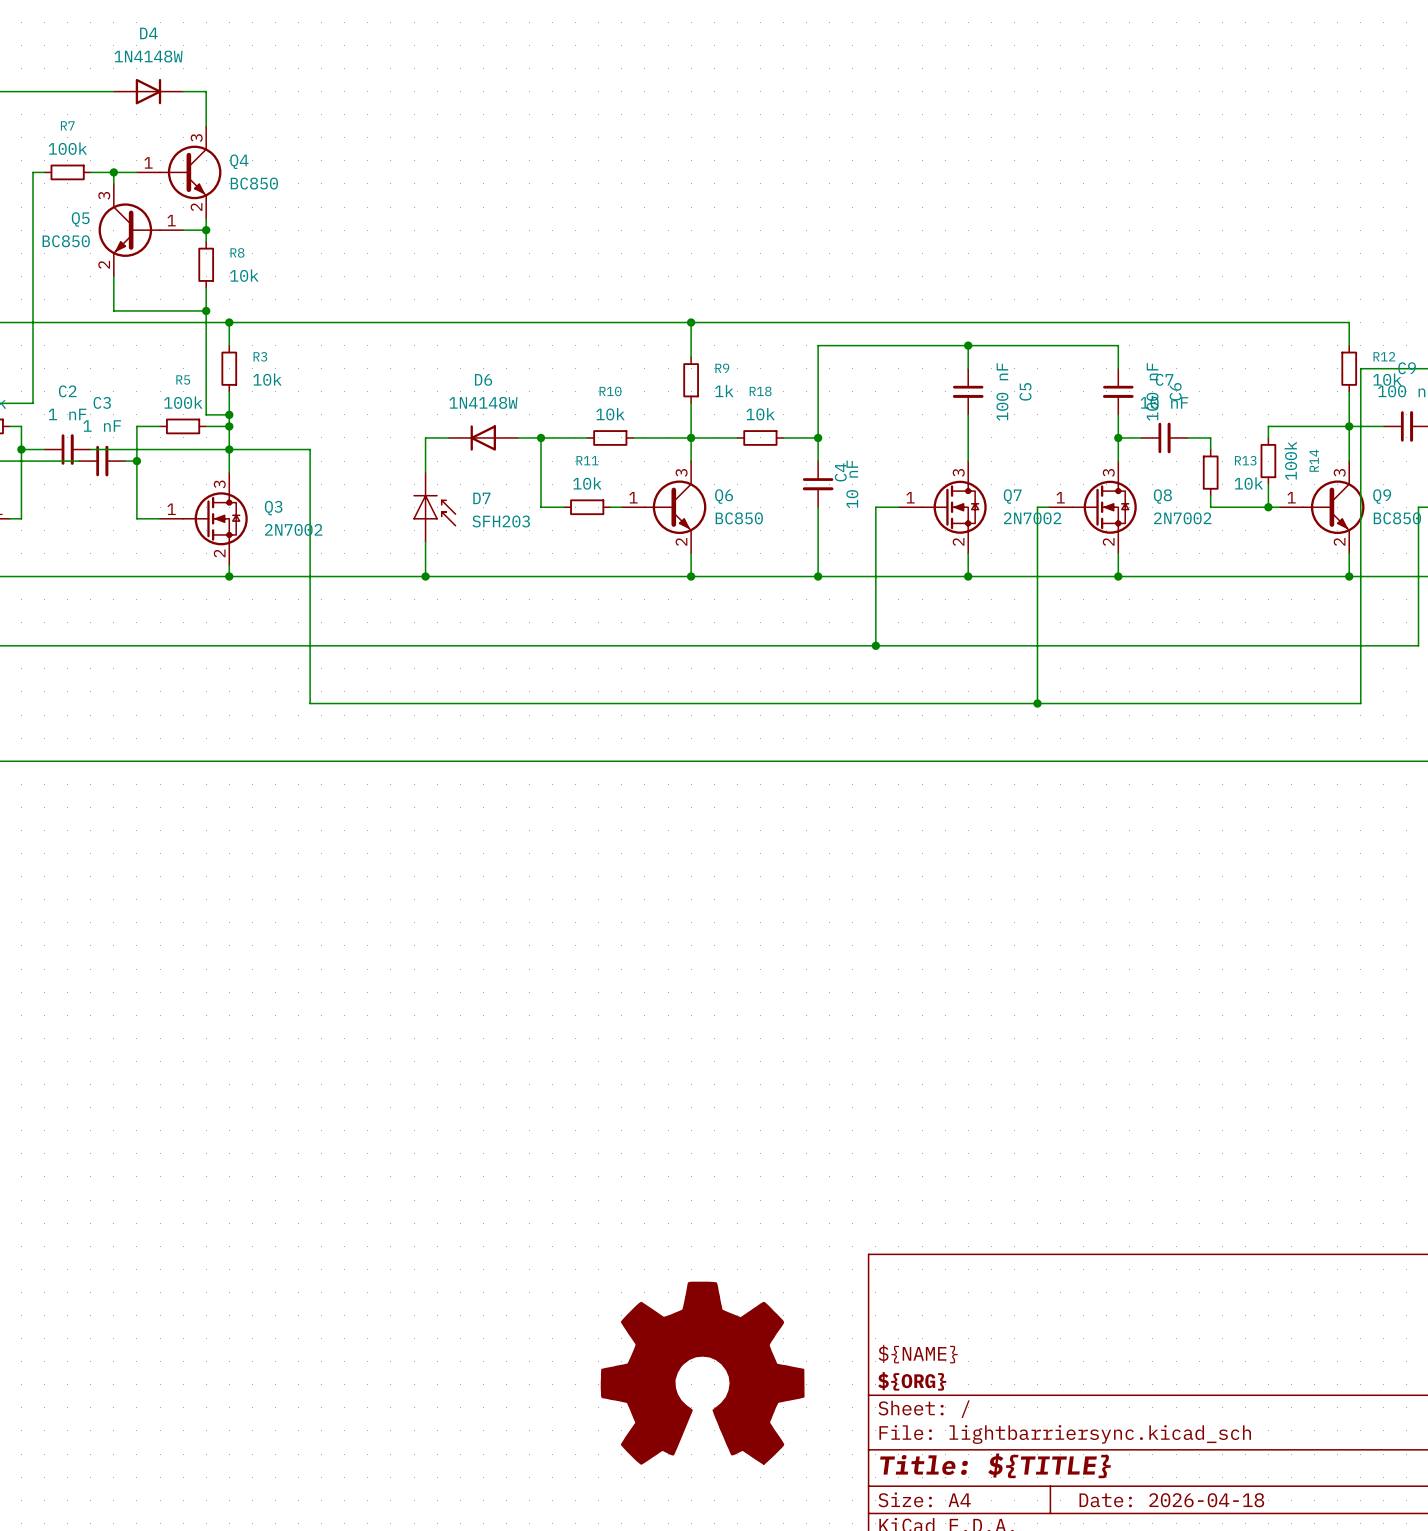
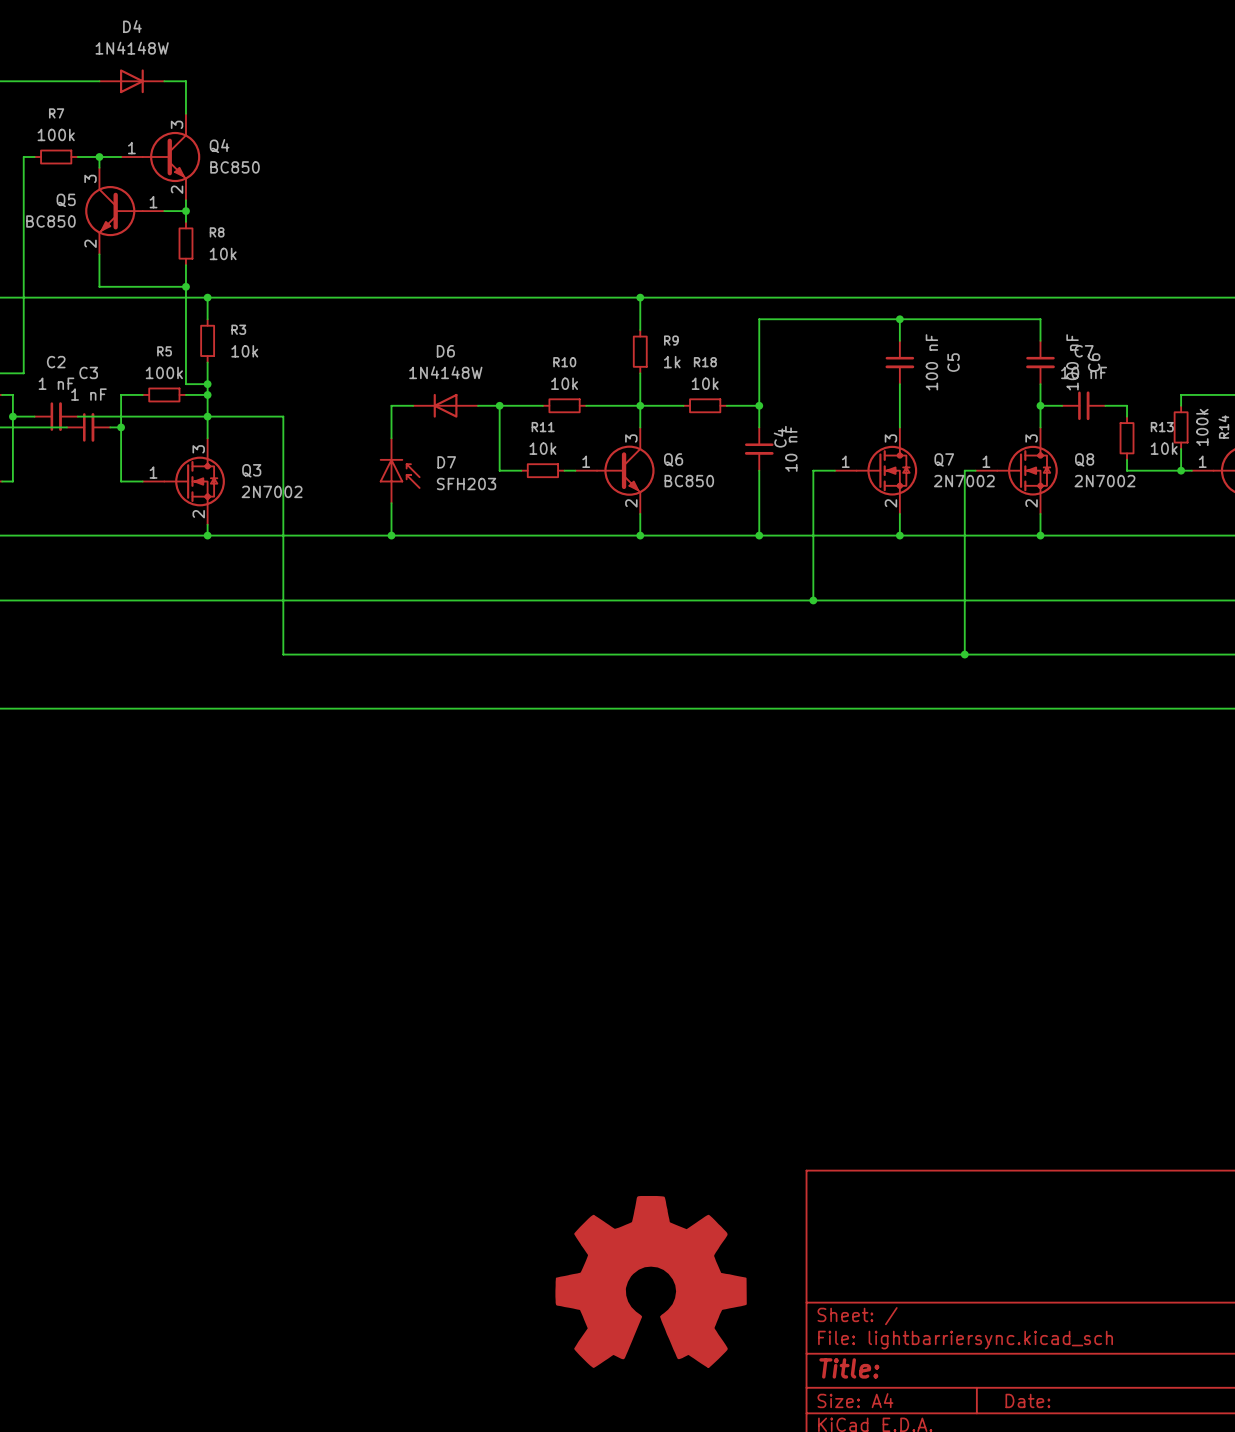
title block: ${NAME} (918, 1354) -> none
title block: ${ORG} (912, 1381) -> none
title block: Title: ${TITLE} (995, 1465) -> Title: (849, 1368)
title block: Date: 2026-04-18 (1171, 1500) -> Date: (1027, 1400)

